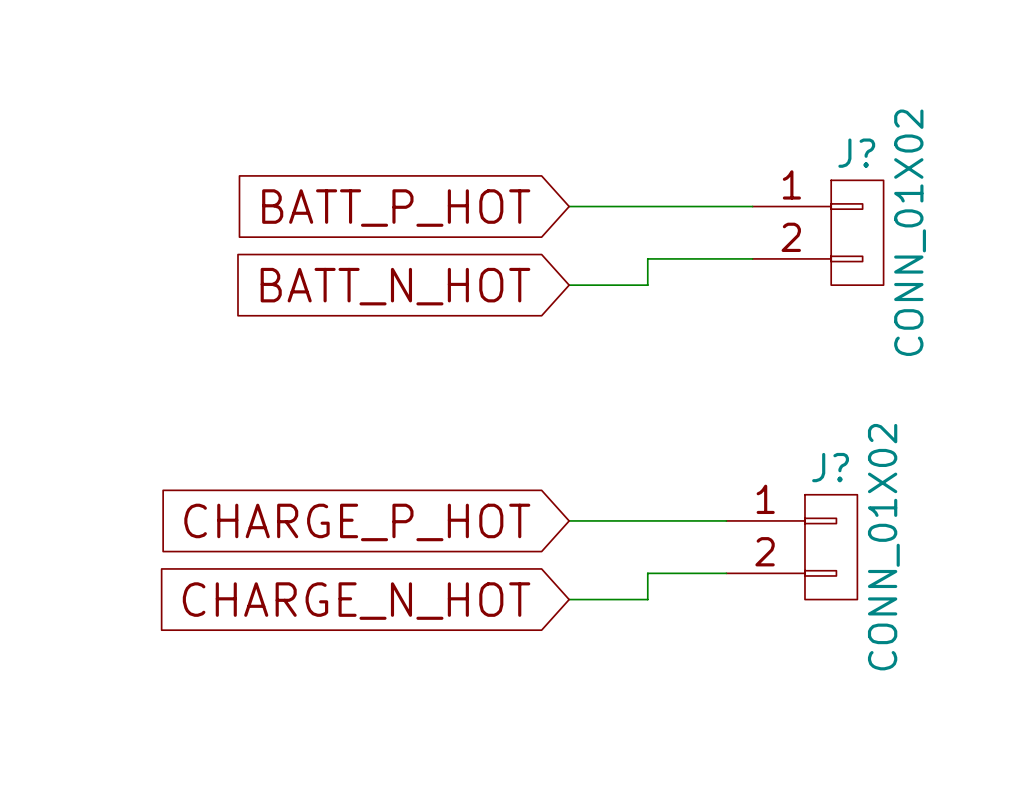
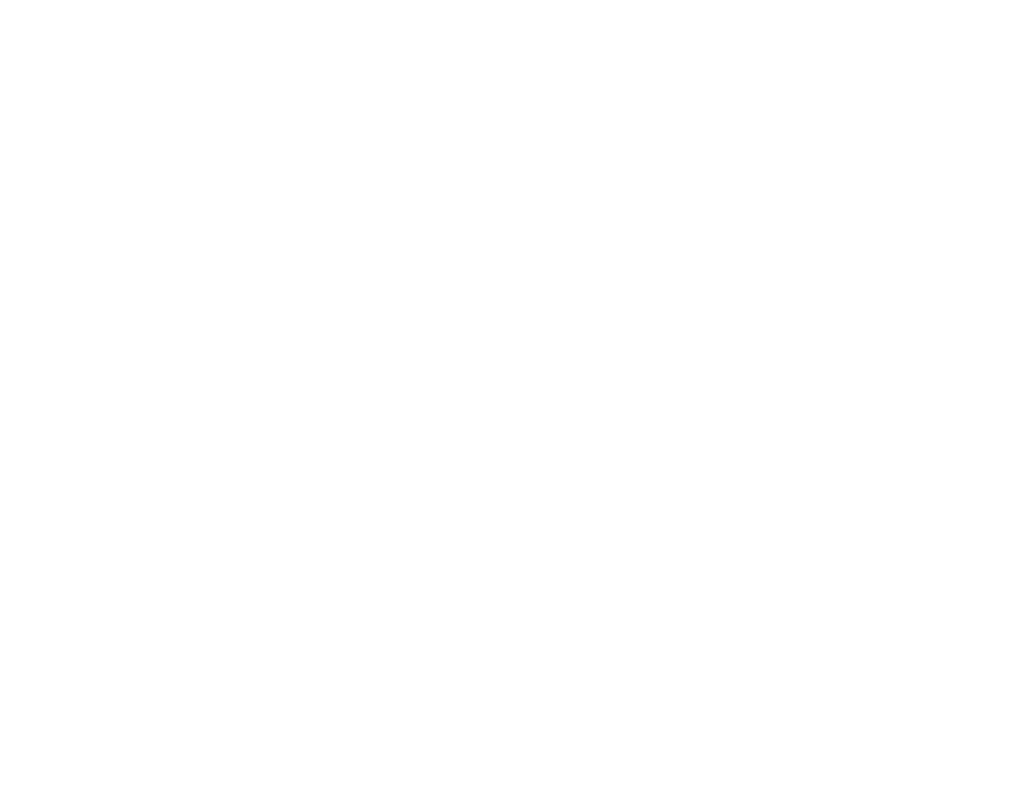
wire: (569, 206) (752, 206) -> none
global label: BATT_P_HOT (396, 208) -> none
J?: CONN_01X02 (818, 232) -> none
wire: (752, 258) (647, 258) (647, 285) (569, 285) -> none
global label: BATT_N_HOT (395, 286) -> none
wire: (569, 520) (726, 520) -> none
global label: CHARGE_P_HOT (357, 522) -> none
J?: CONN_01X02 (791, 547) -> none
wire: (726, 573) (647, 573) (647, 599) (569, 599) -> none
global label: CHARGE_N_HOT (356, 601) -> none

